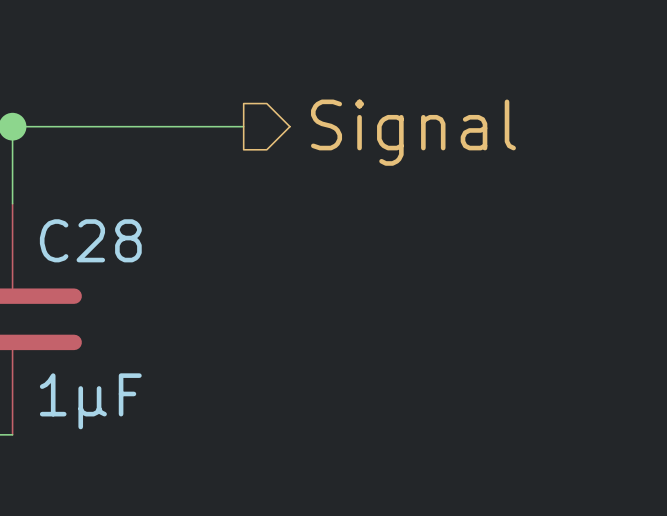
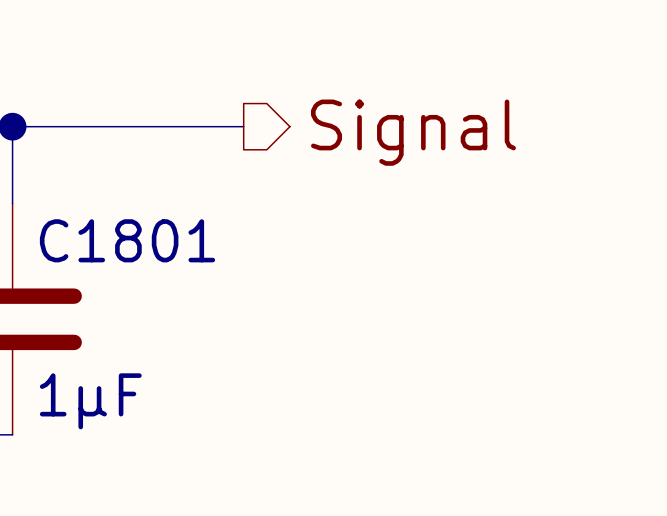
C28 name: C28 (90, 240) -> C1801 (127, 240)

